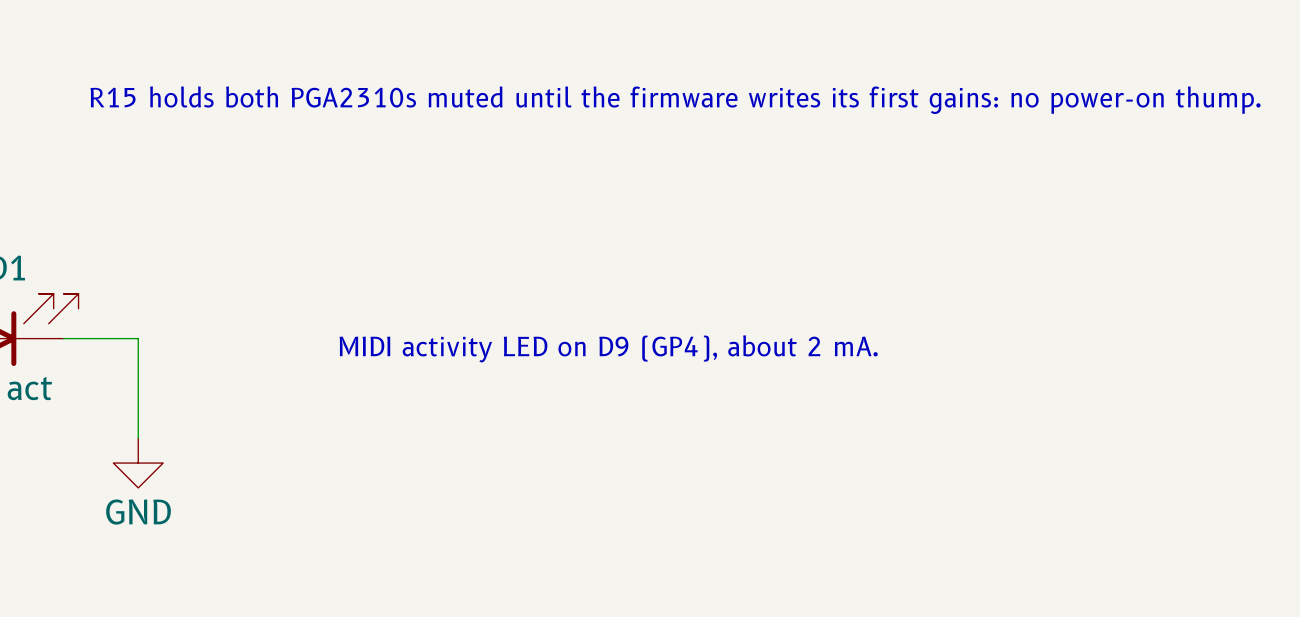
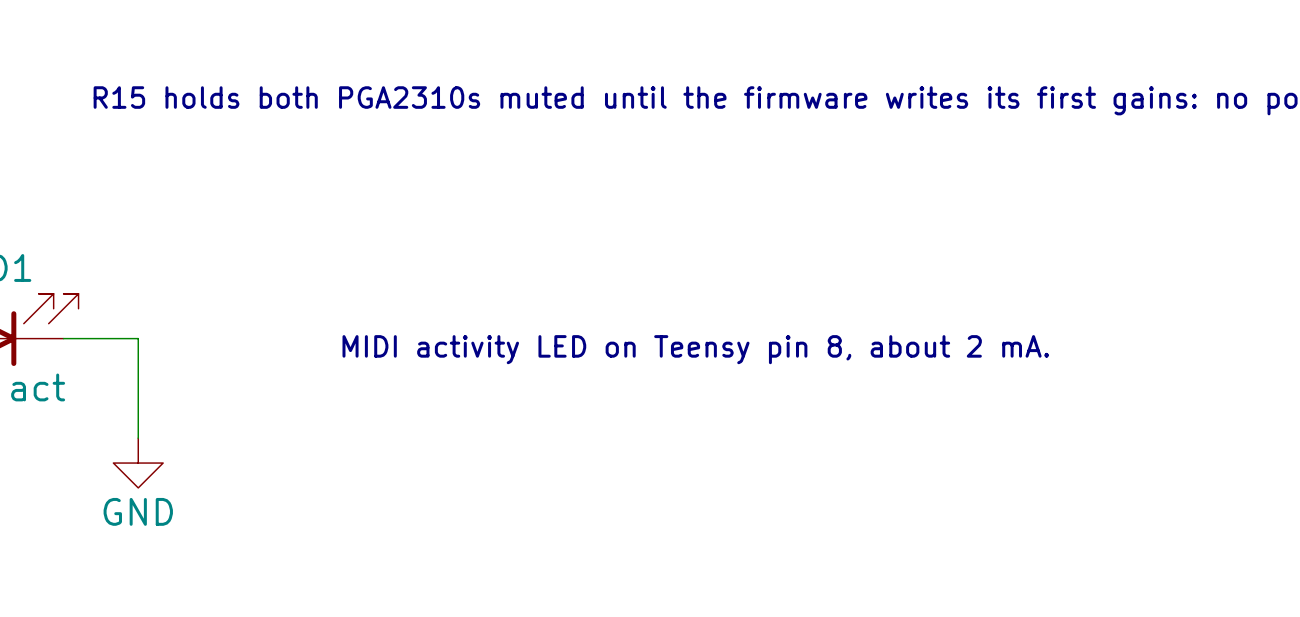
text: MIDI activity LED on D9 (GP4), about 2 mA. (608, 348) -> MIDI activity LED on Teensy pin 8, about 2 mA. (695, 349)

